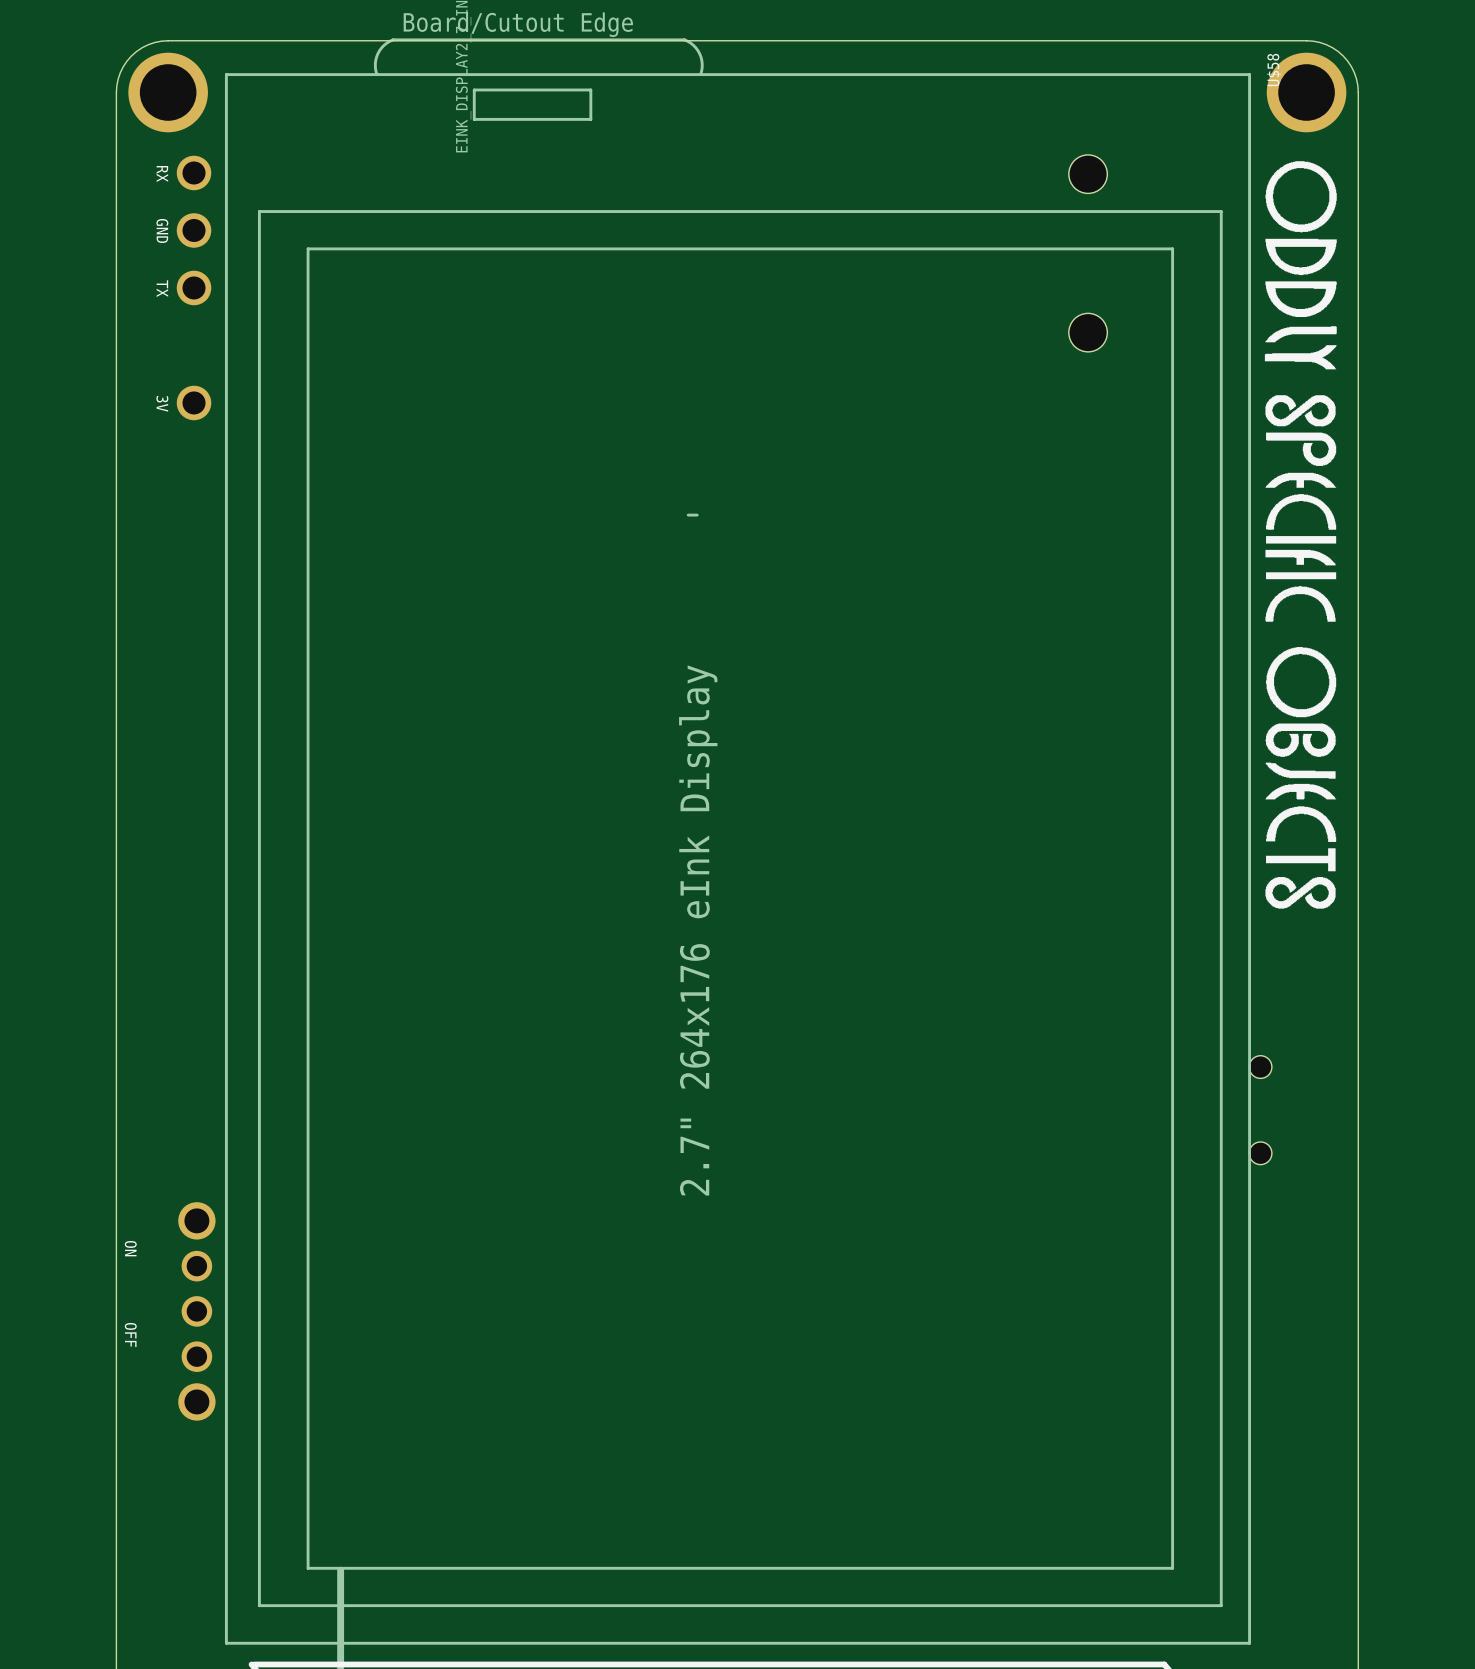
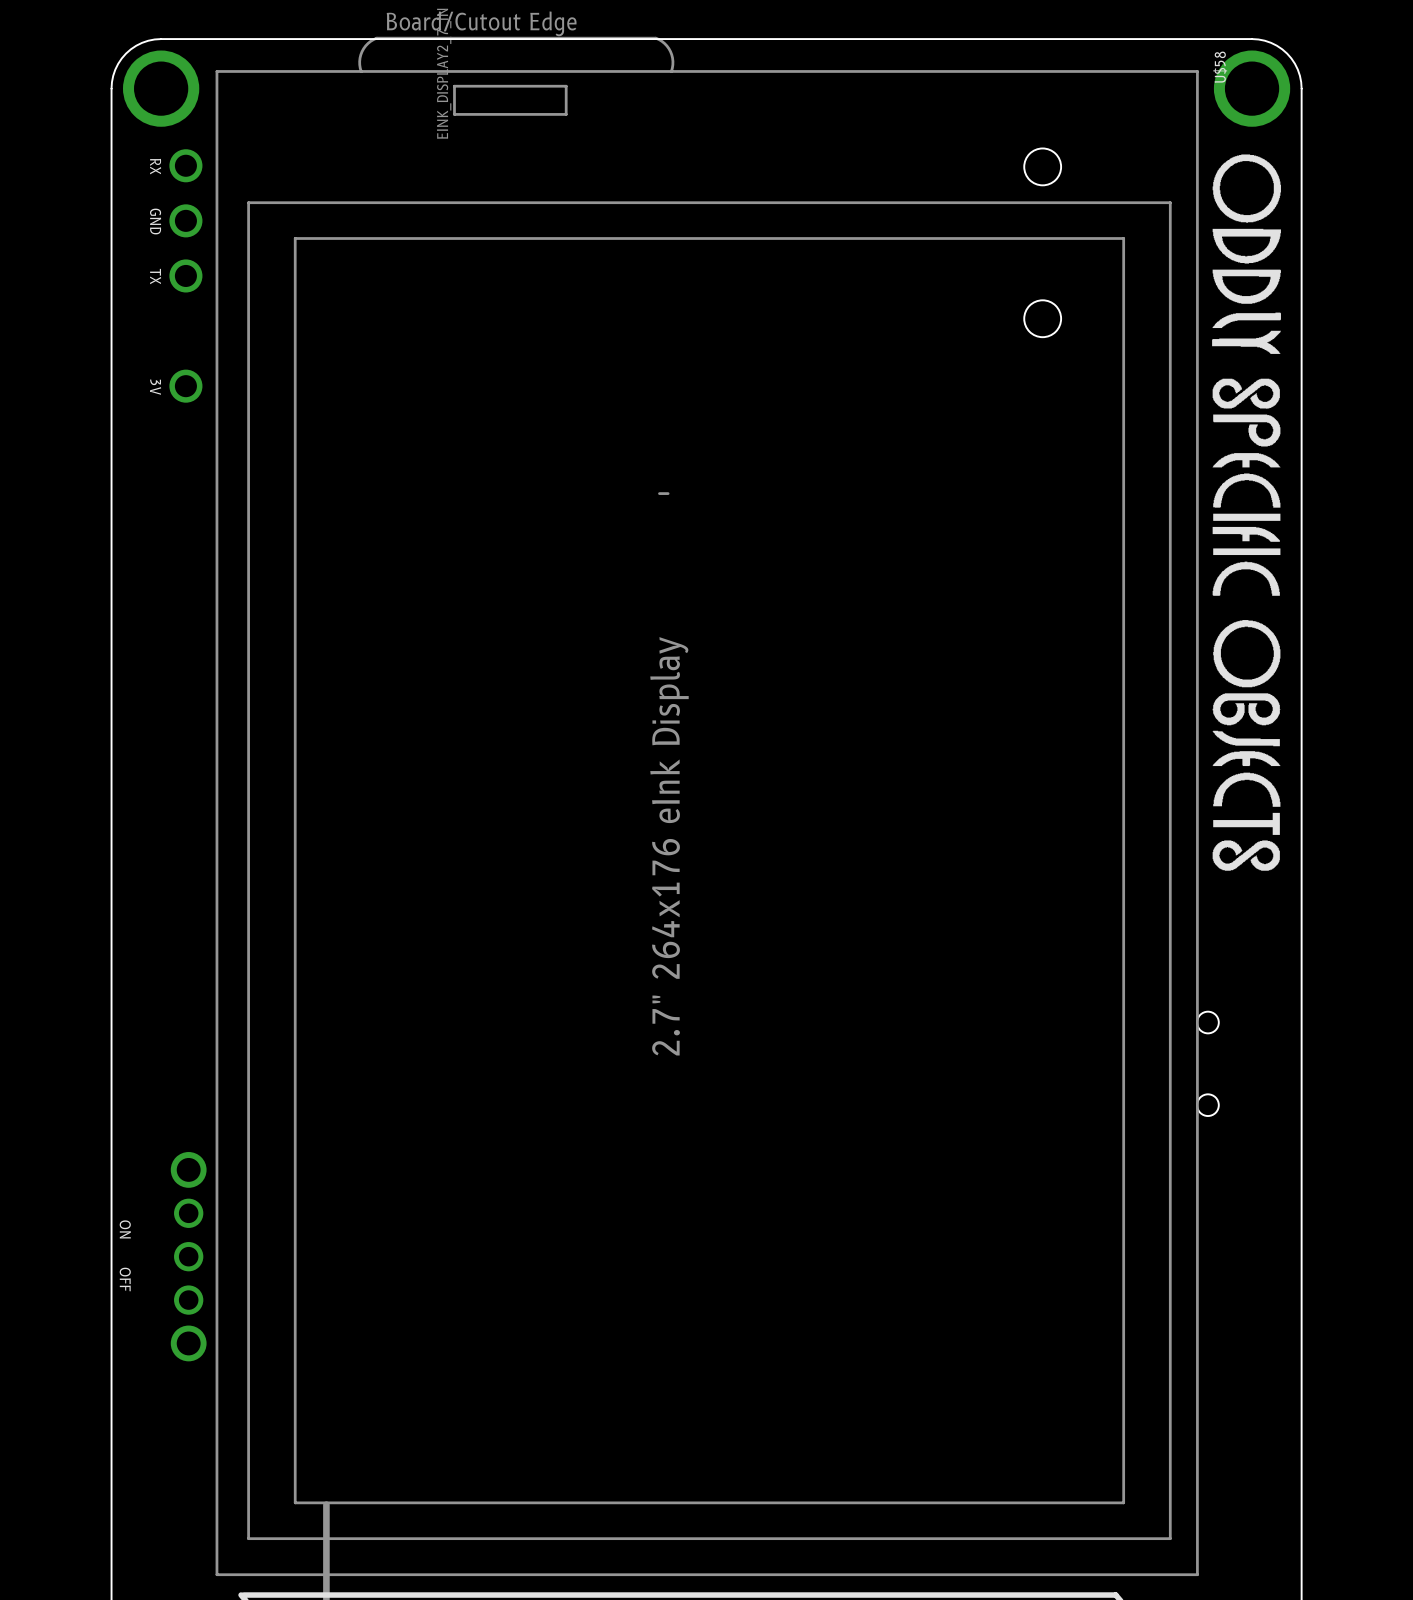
text position: ON (130, 1248) -> ON (125, 1229)

